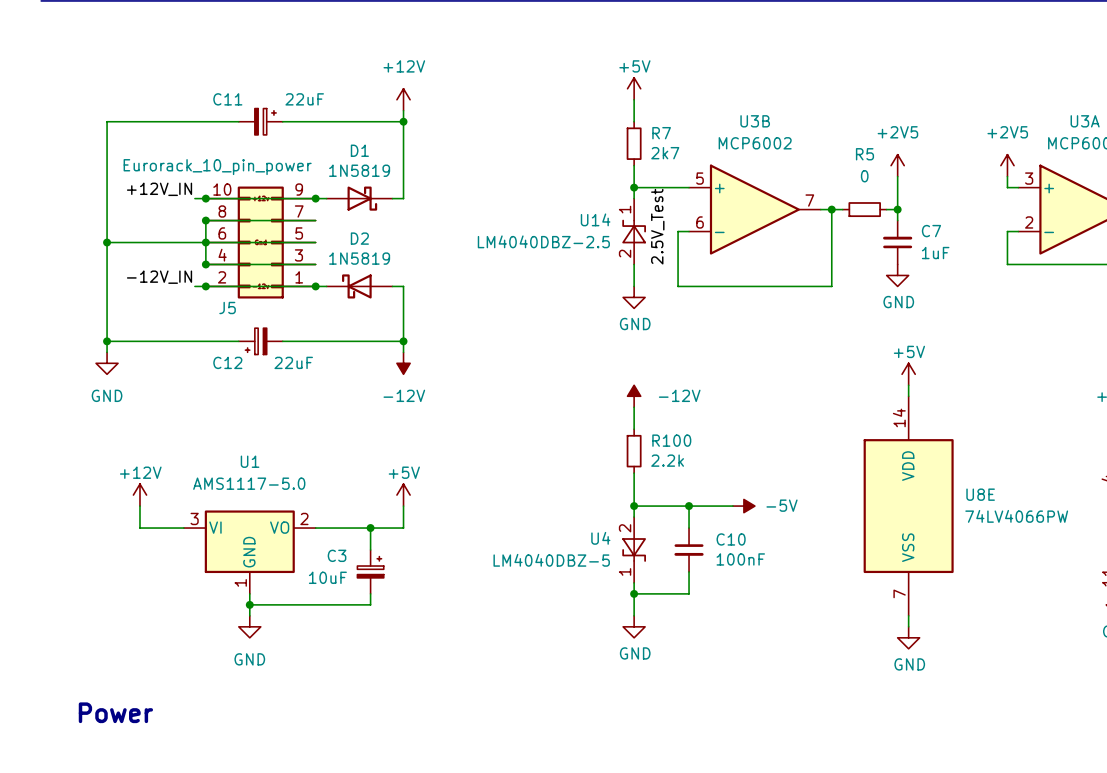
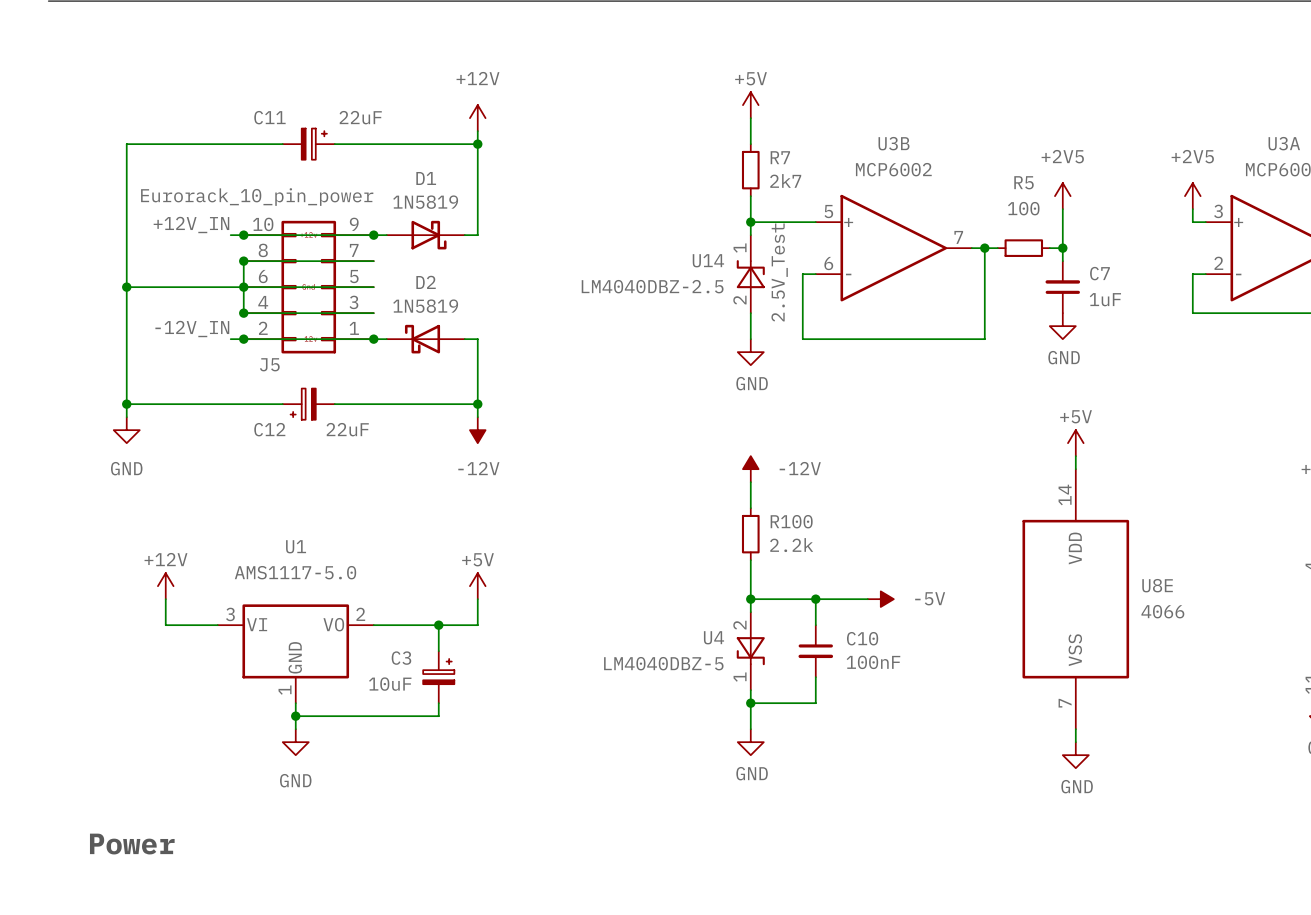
R5 value: 0 (864, 176) -> 100 (1023, 208)
U8E value: 74LV4066PW (1016, 516) -> 4066 (1162, 611)

